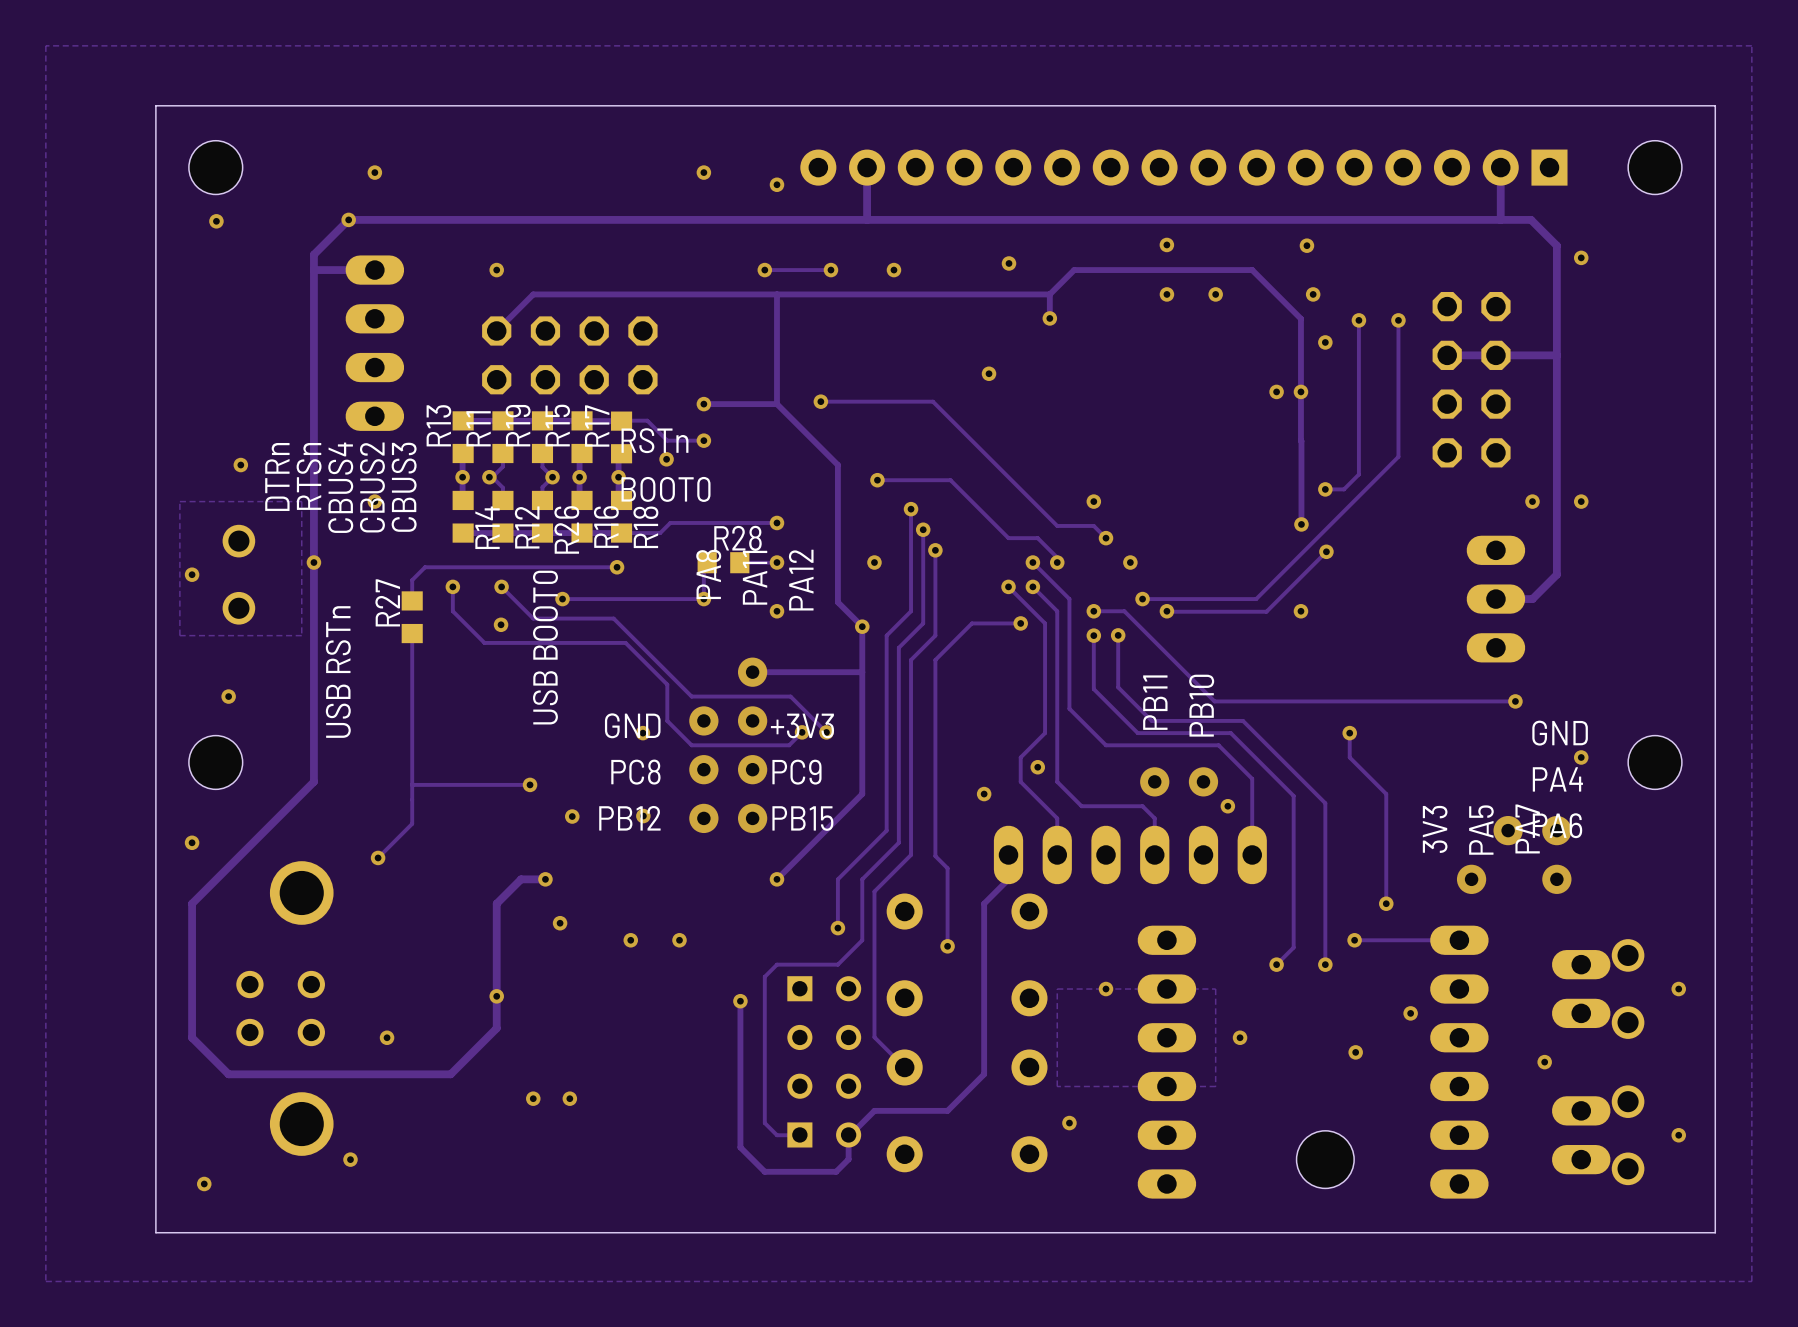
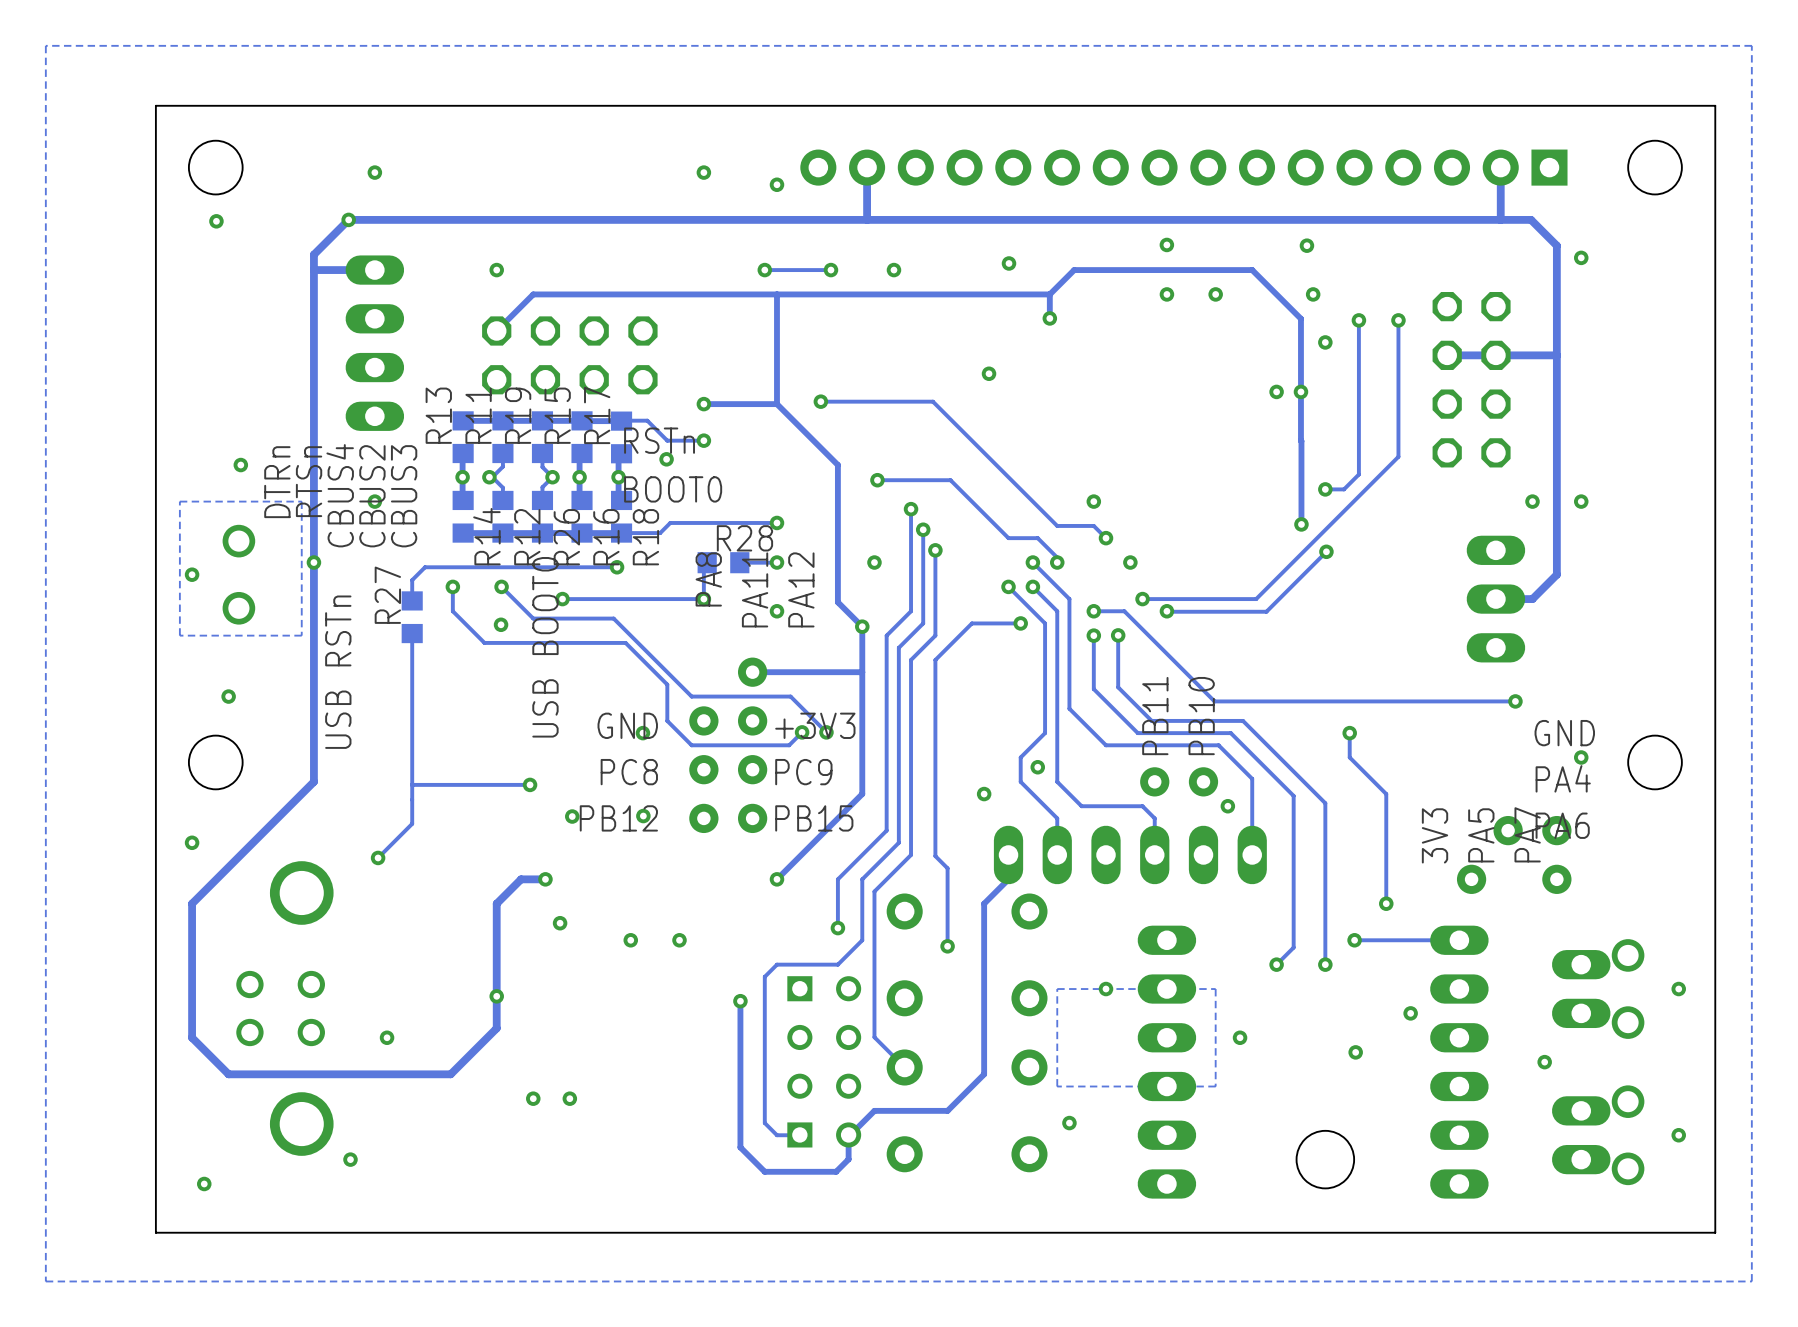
via: (1300, 611) -> none

